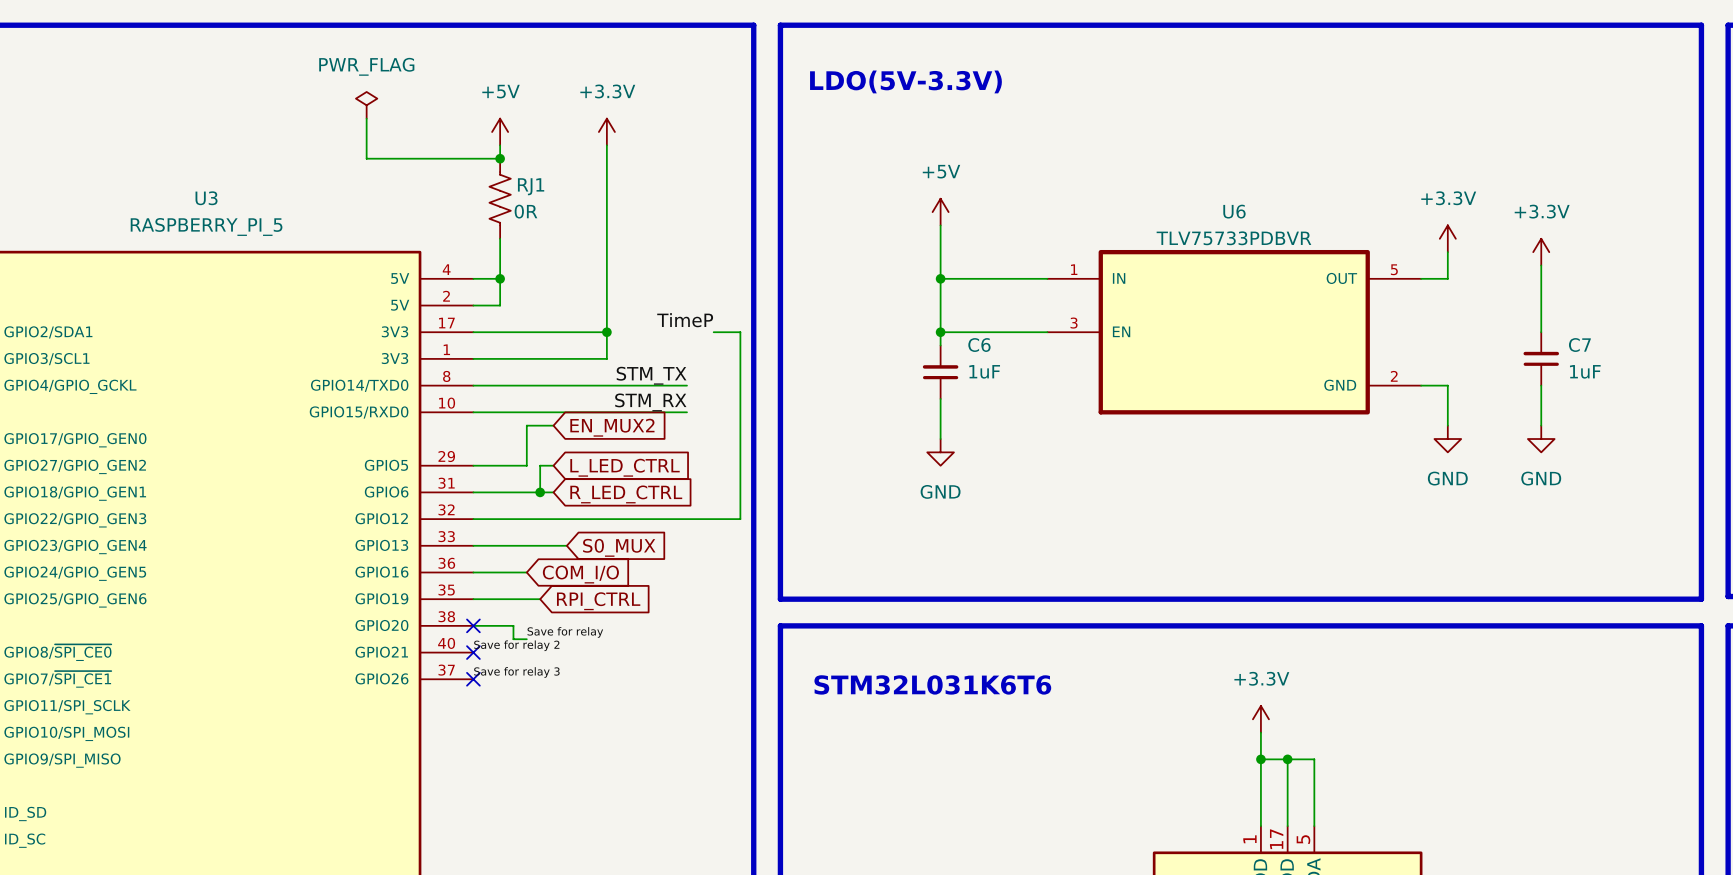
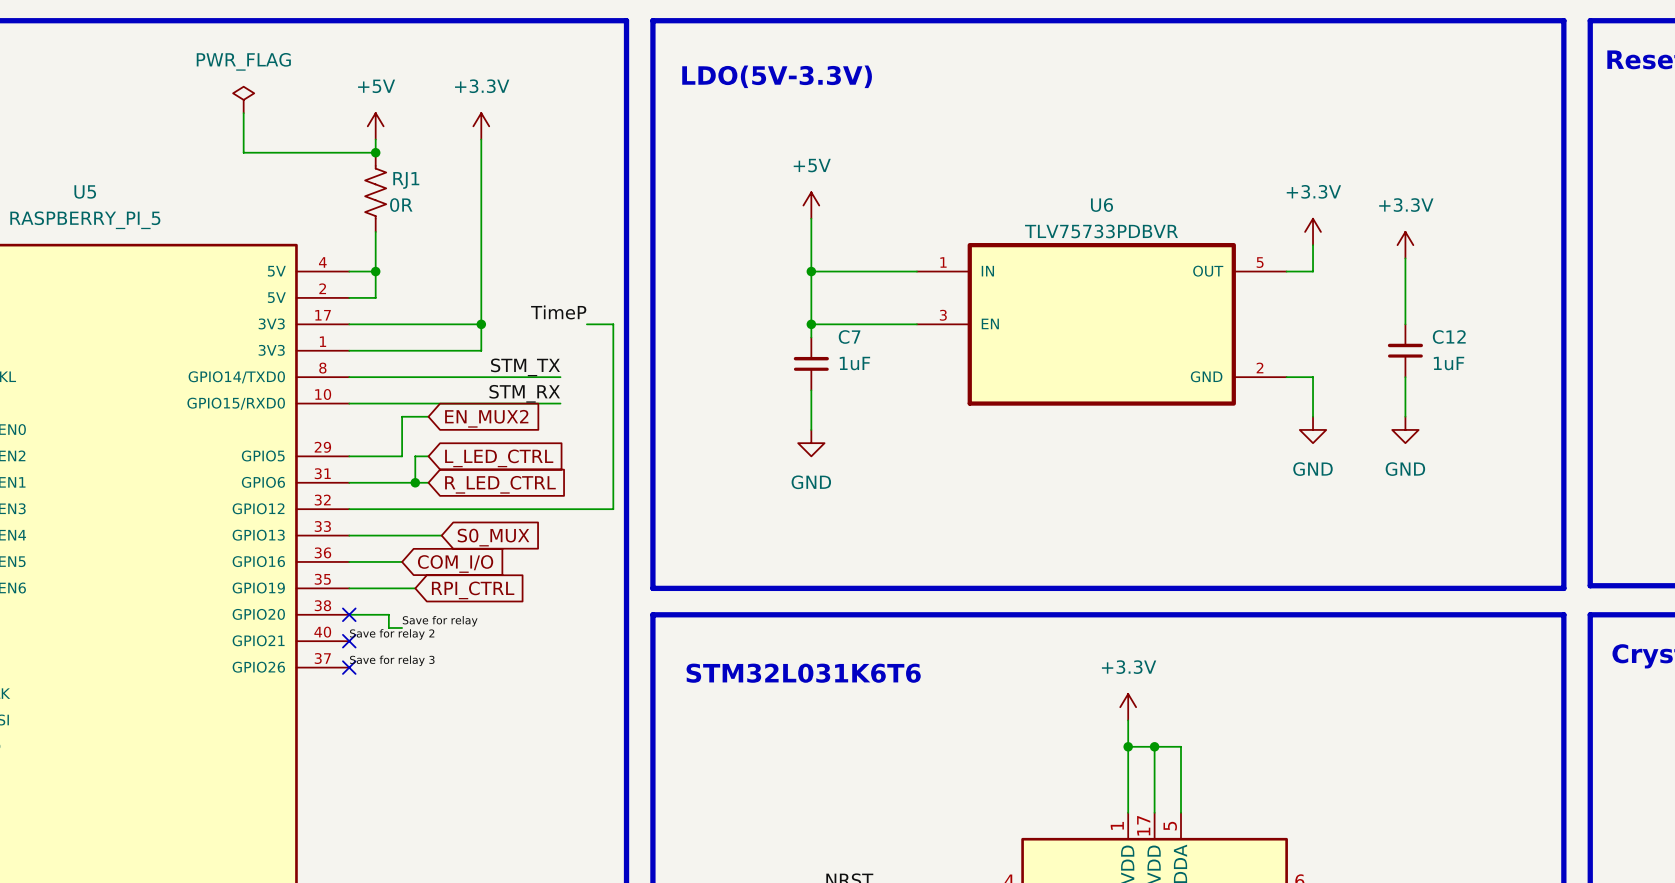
U3 name: U3 (206, 198) -> U5 (85, 191)
C6 name: C6 (979, 345) -> C7 (849, 336)
C7 name: C7 (1579, 345) -> C12 (1449, 336)

